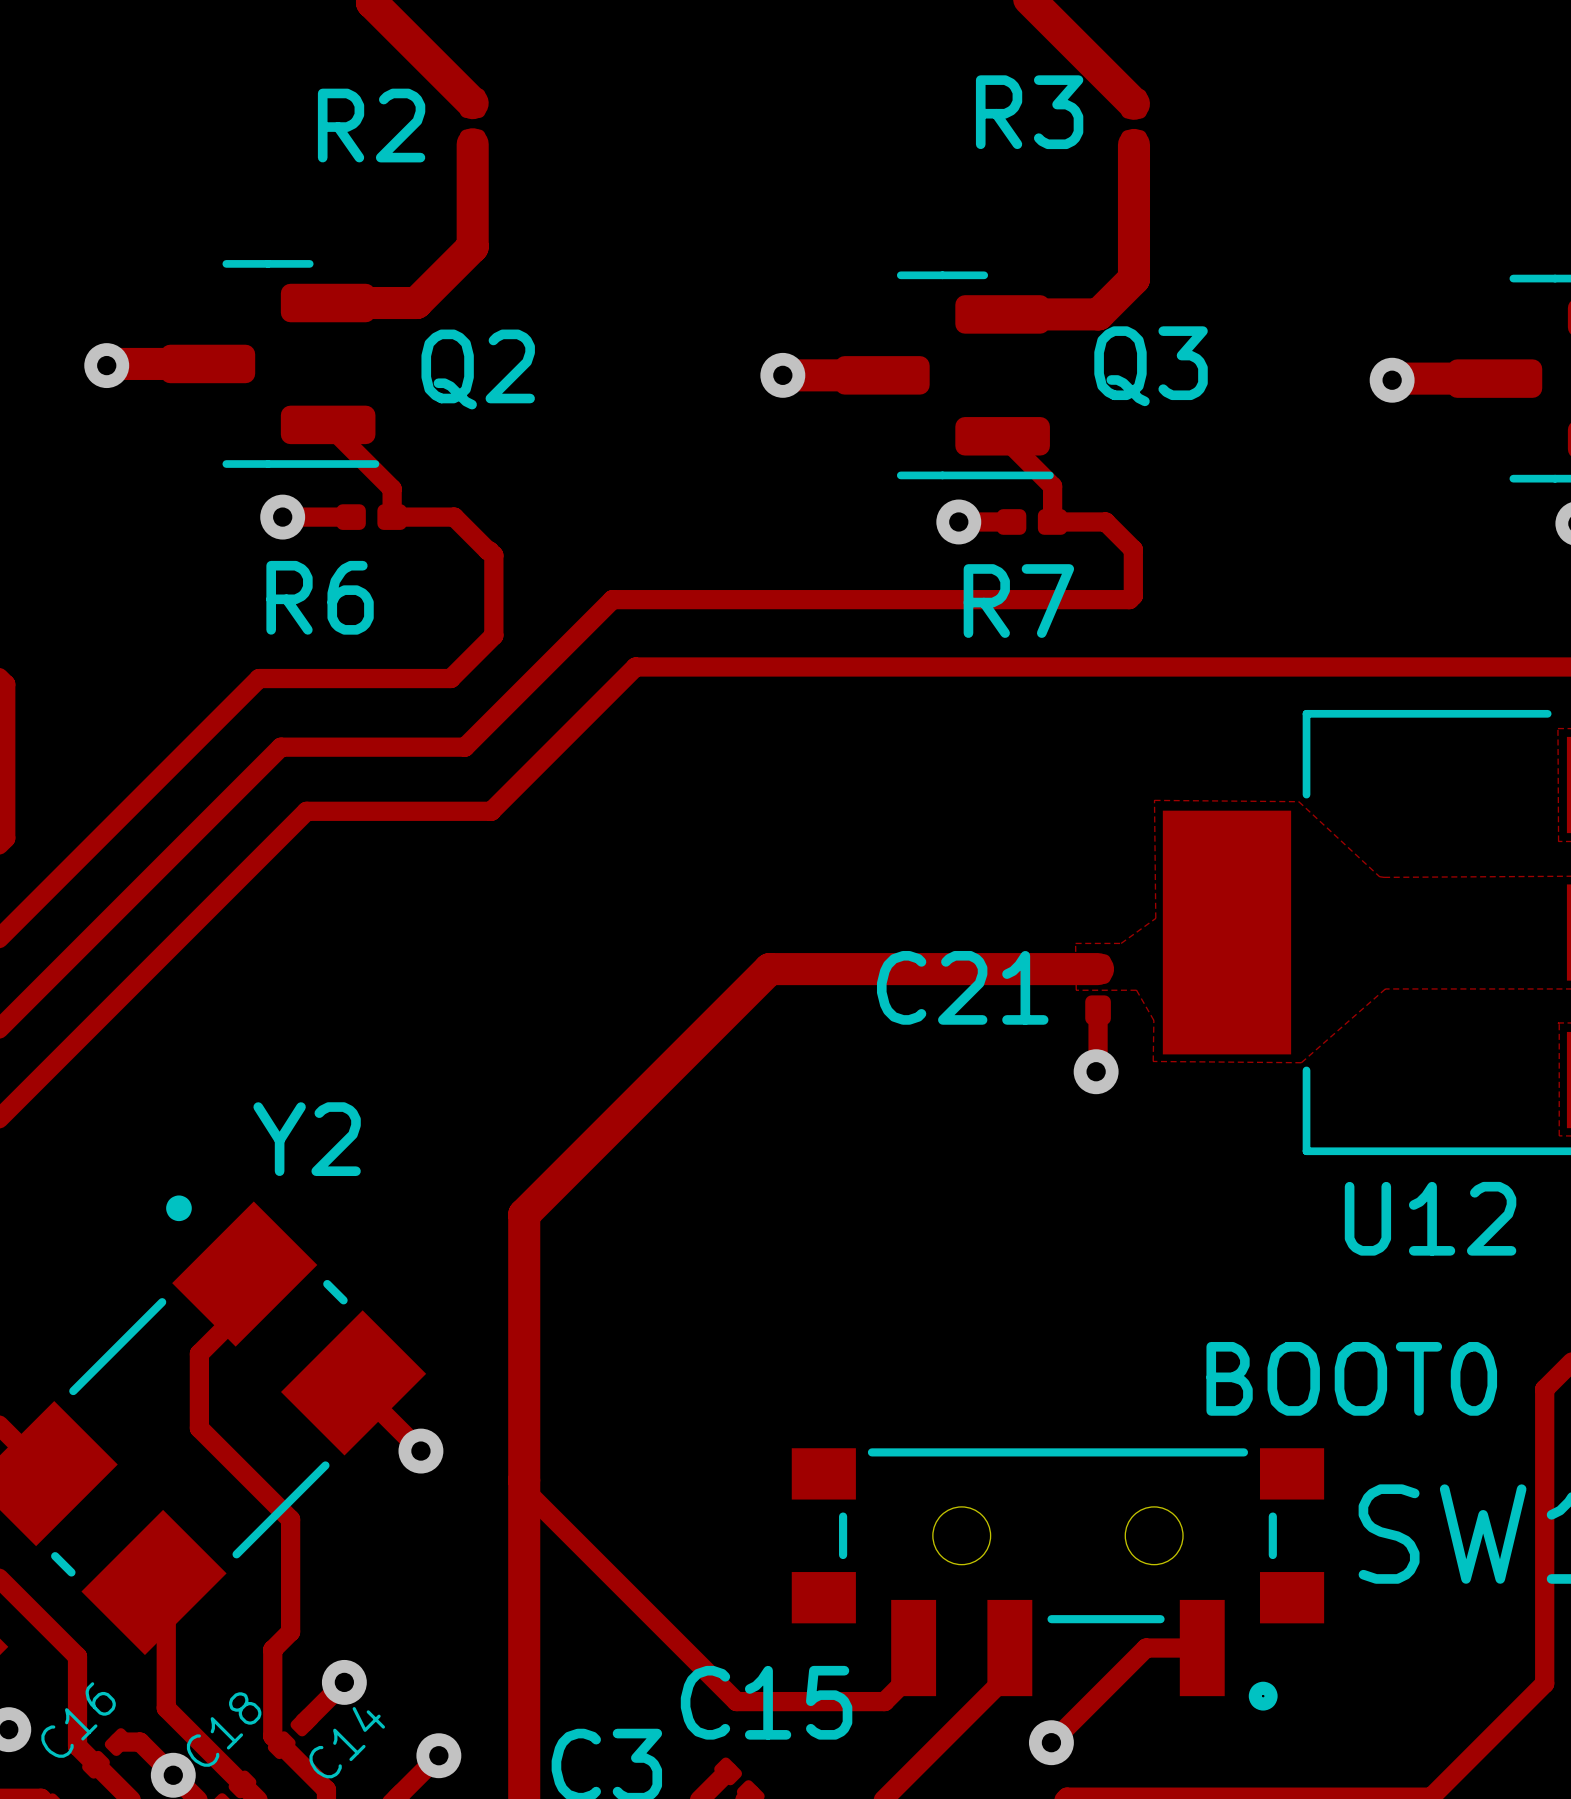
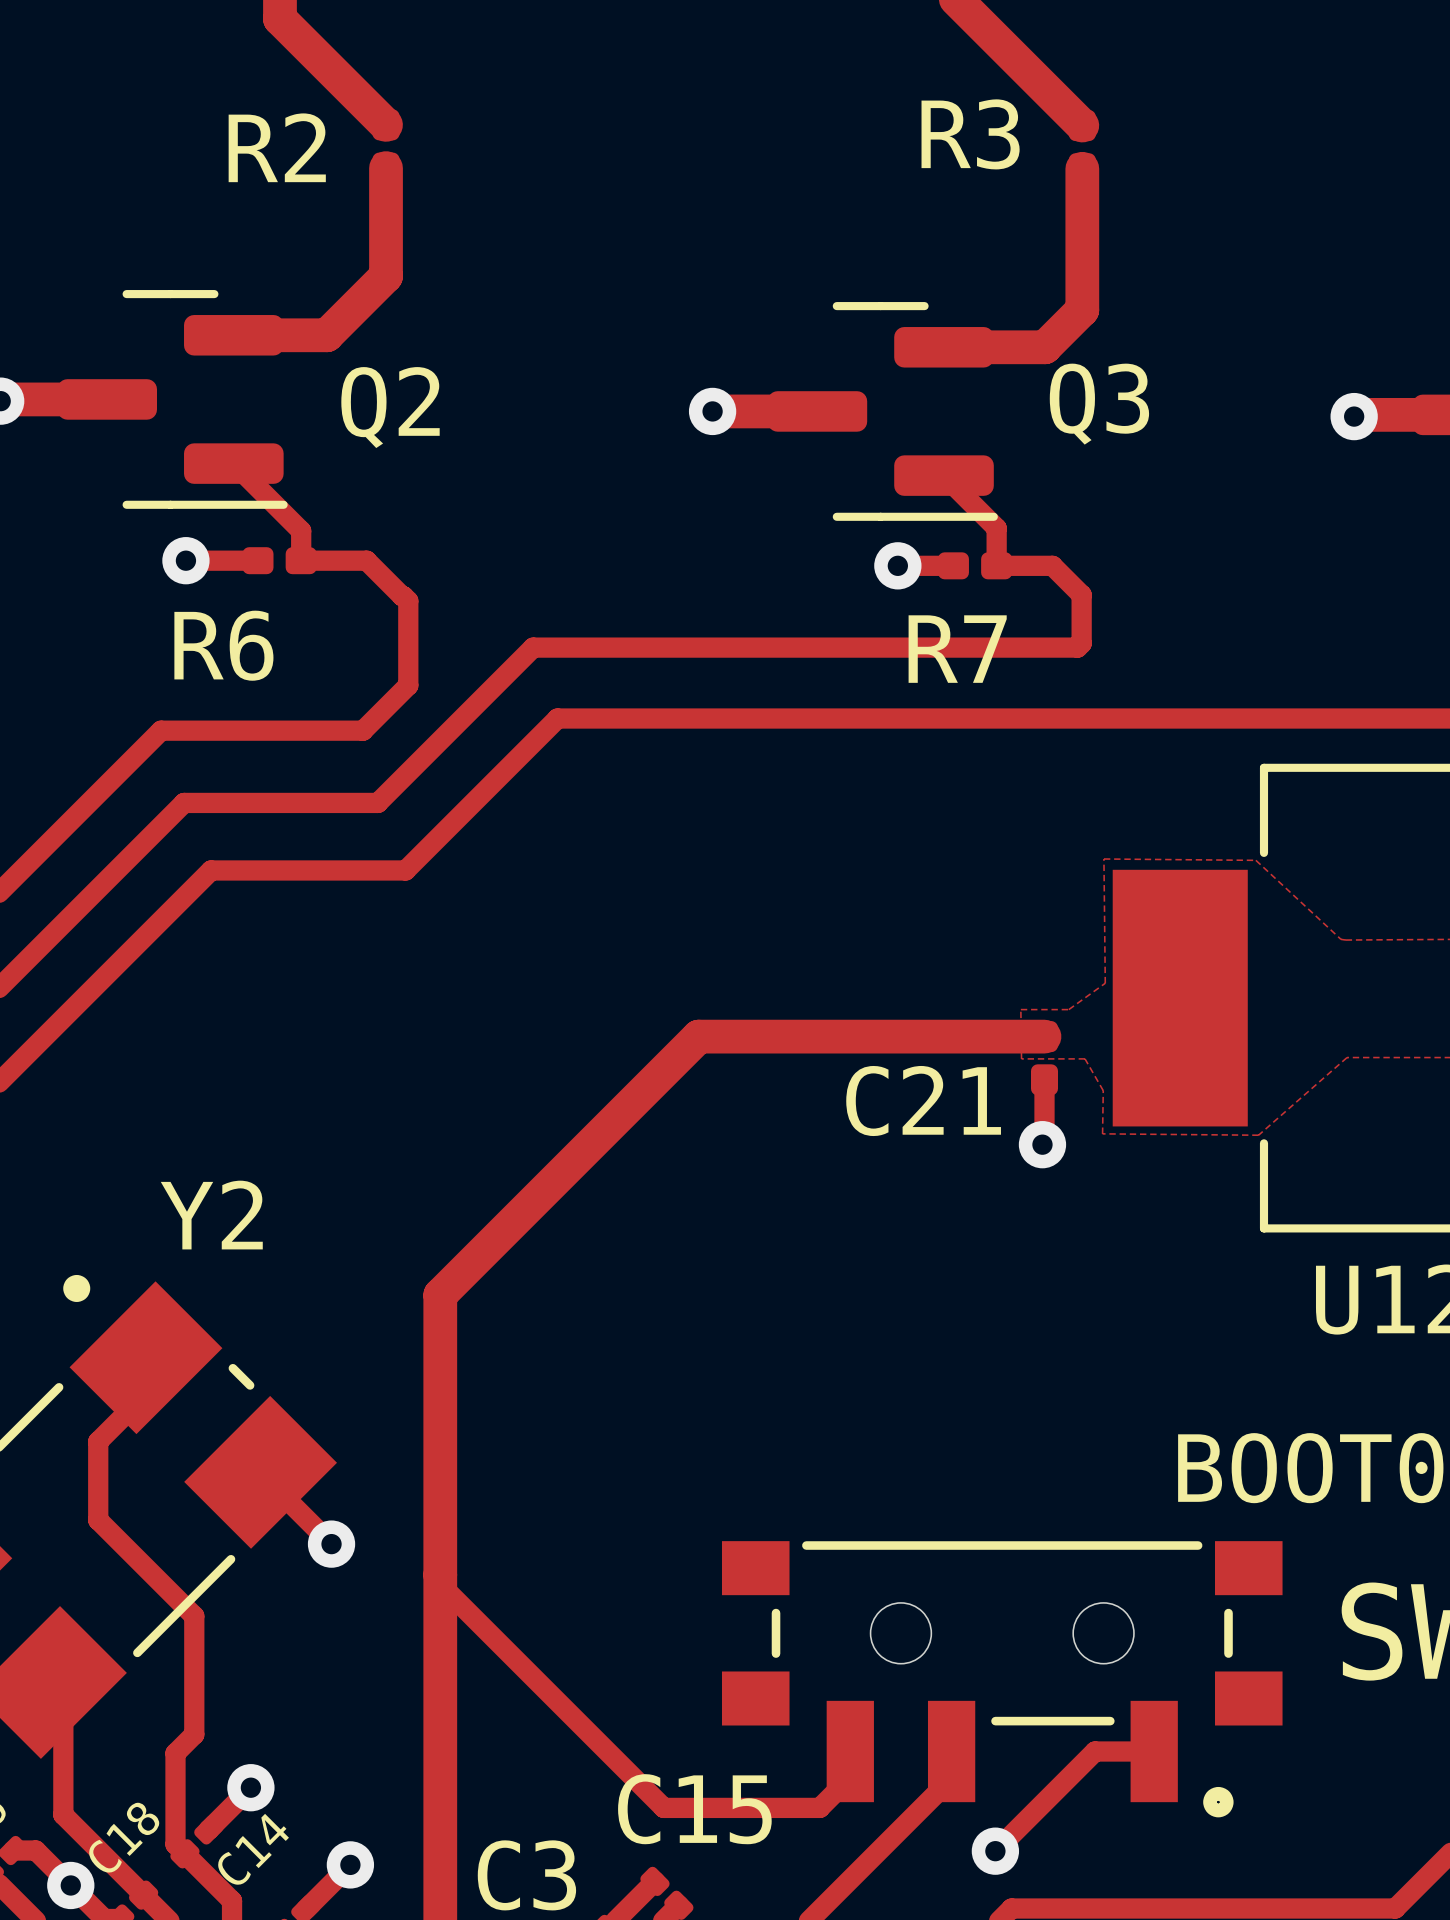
C21 name position: C21 (962, 987) -> C21 (923, 1101)

